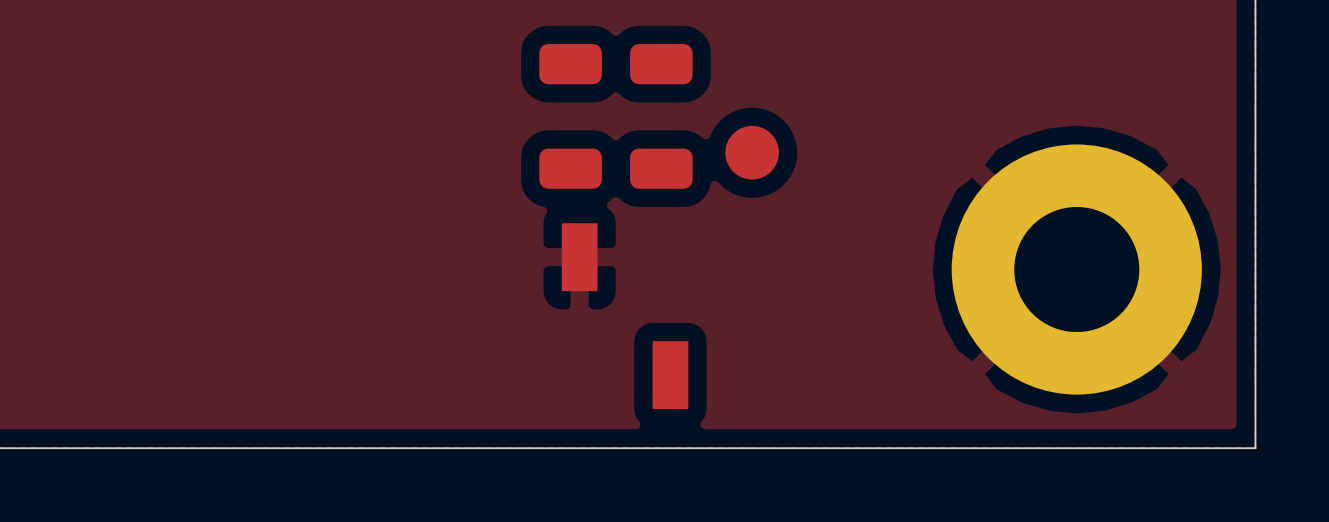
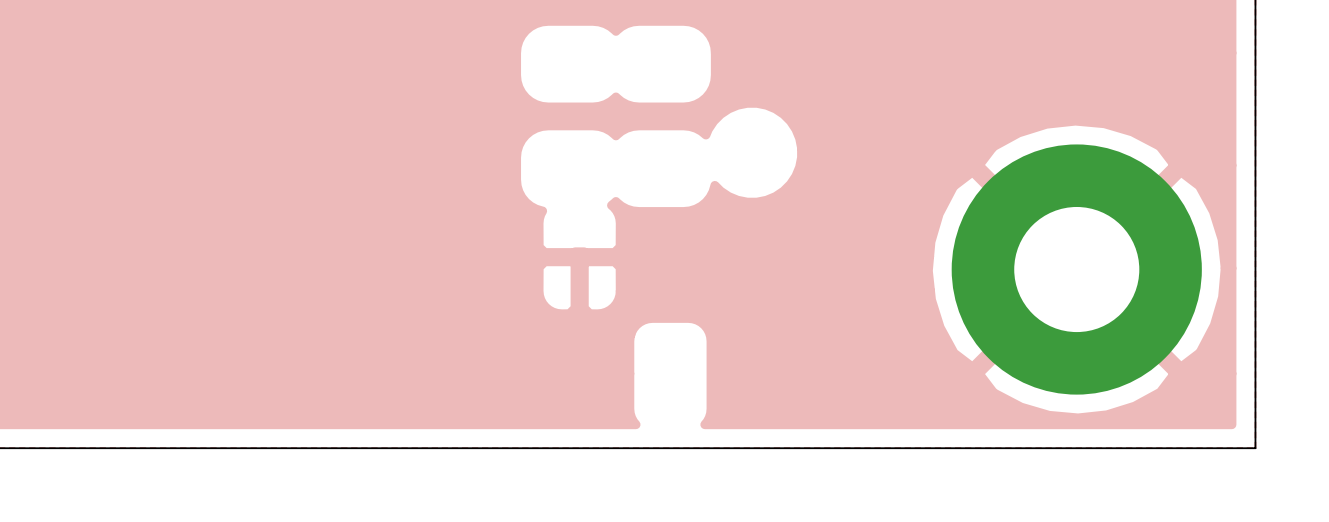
part: (570, 116) -> none
part: (661, 116) -> none
part: (752, 152) -> none
part: (625, 316) -> none

